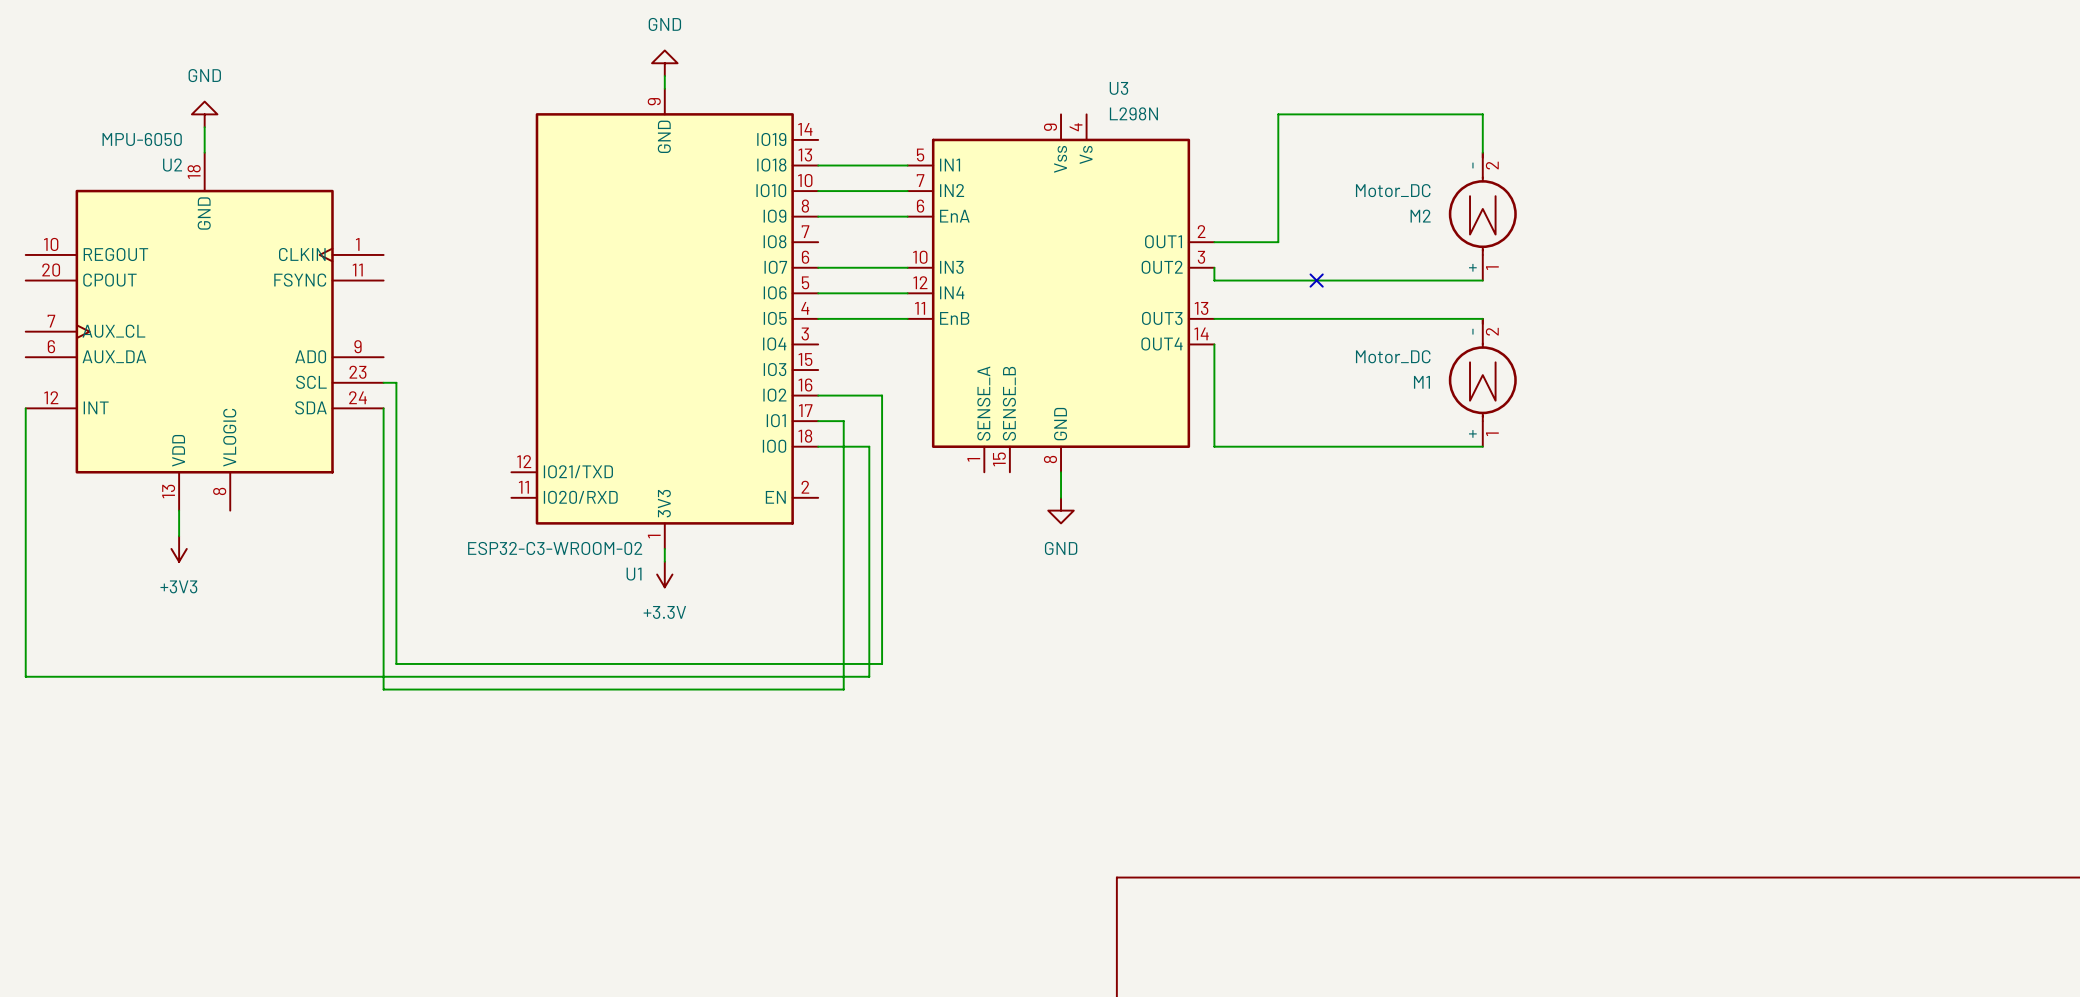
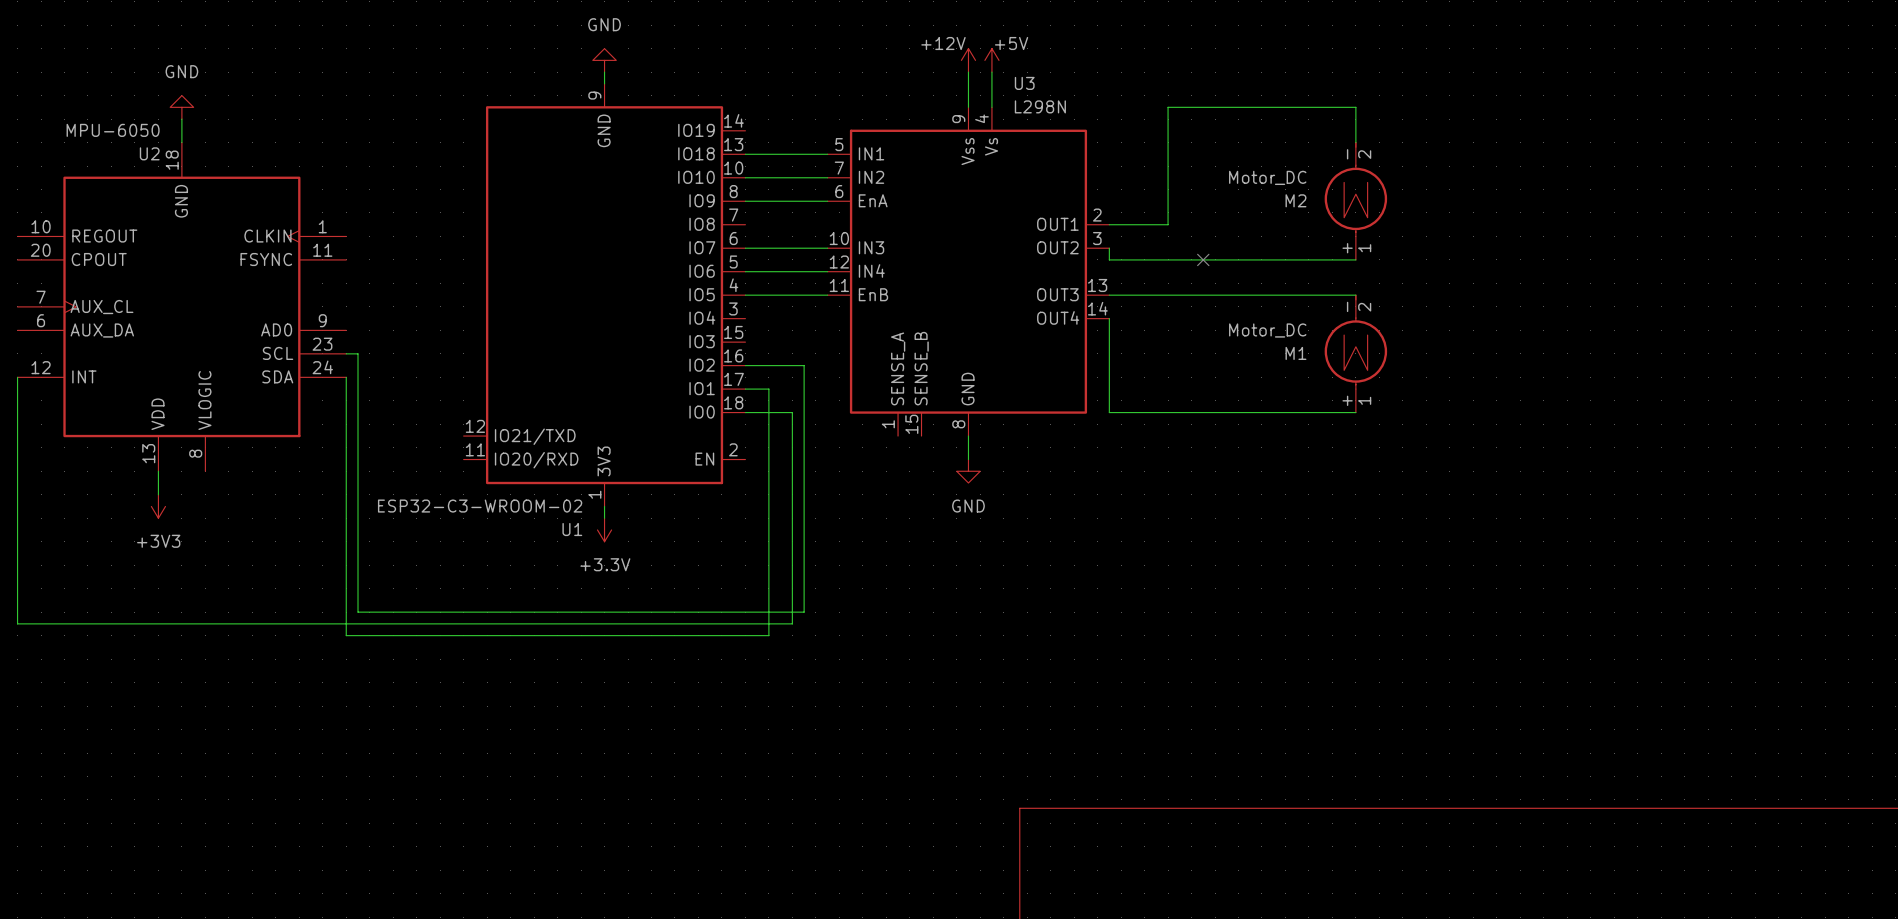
power symbol: none -> +12V (968, 60)
power symbol: none -> +5V (991, 60)
wire: none -> (968, 72) (968, 107)
wire: none -> (991, 72) (991, 107)

